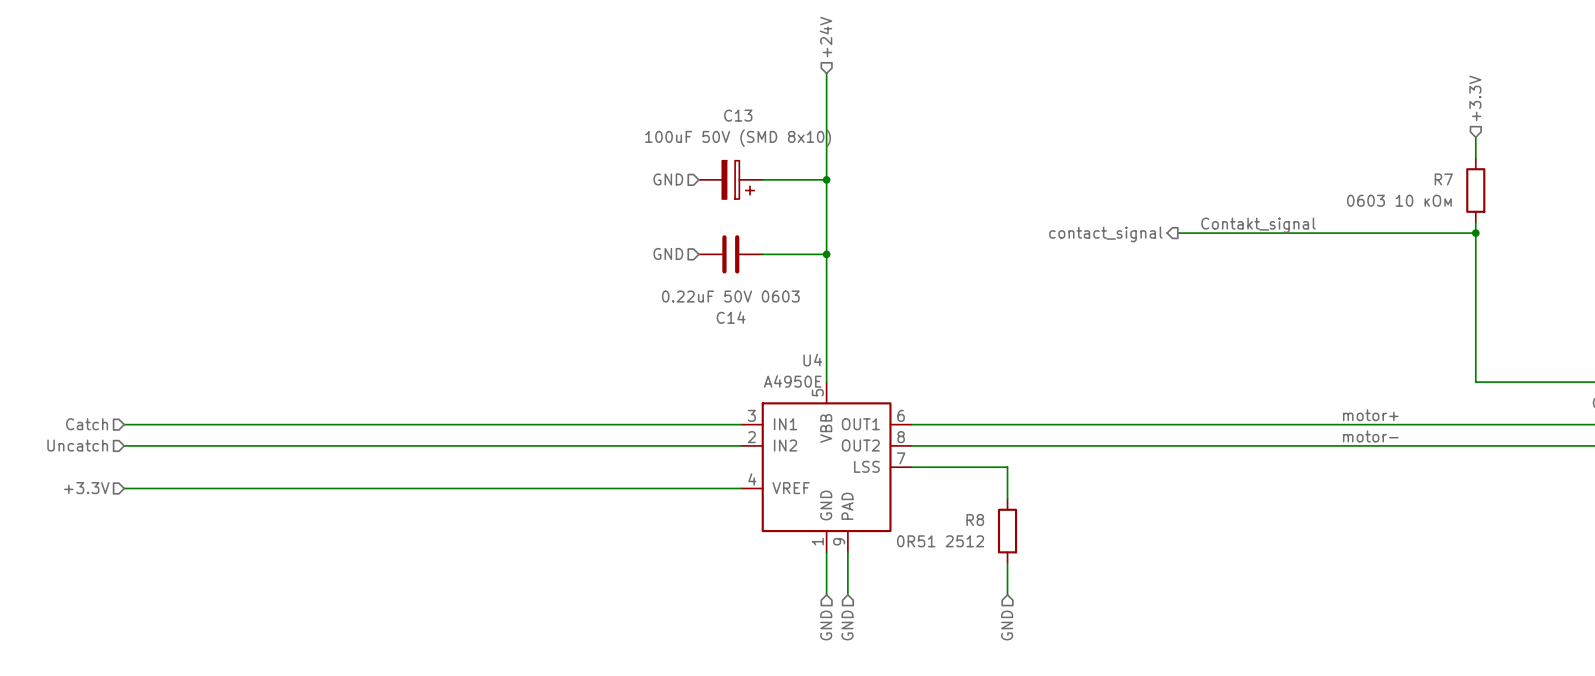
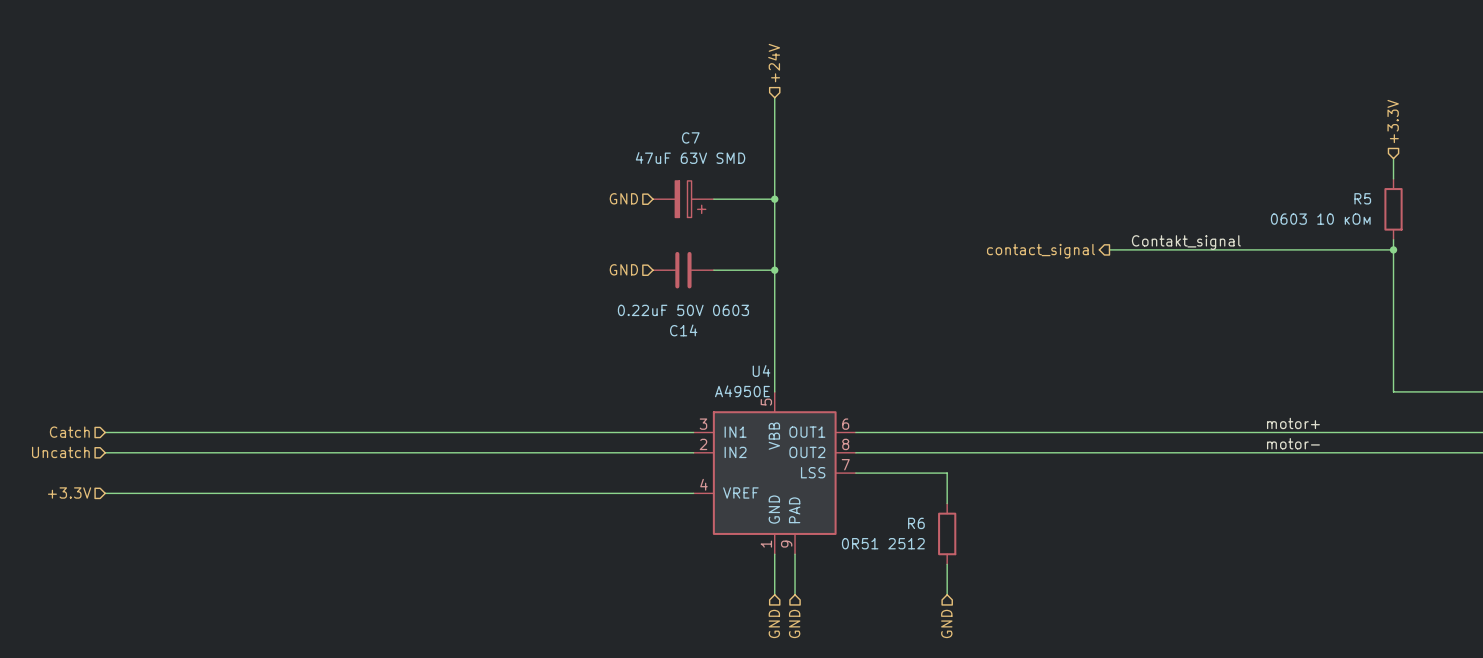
C13 name: C13 (738, 115) -> C7 (690, 137)
C13 value: 100uF 50V (SMD 8х10) (738, 138) -> 47uF 63V SMD (690, 158)
R7 name: R7 (1443, 179) -> R5 (1362, 198)
R8 name: R8 (975, 520) -> R6 (916, 523)

